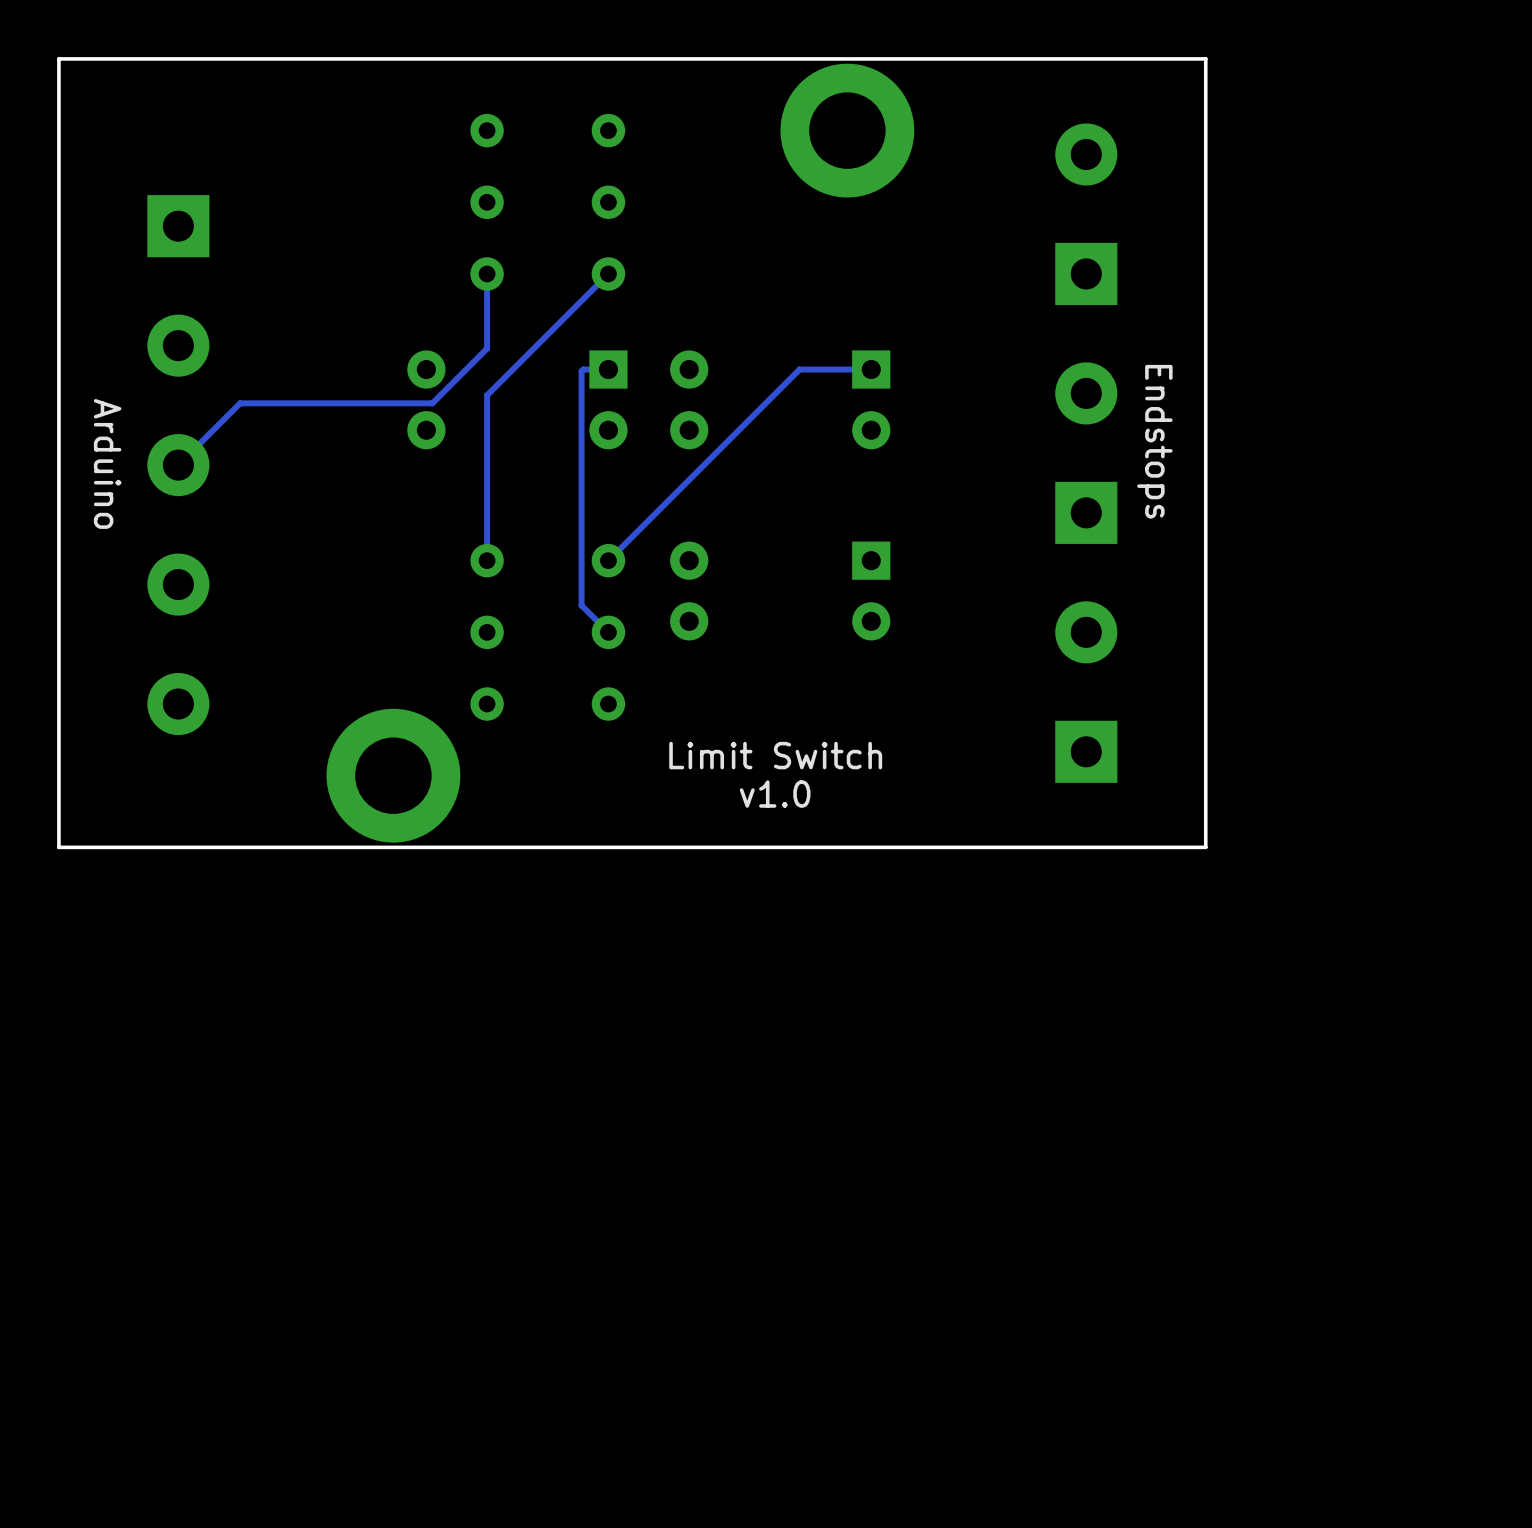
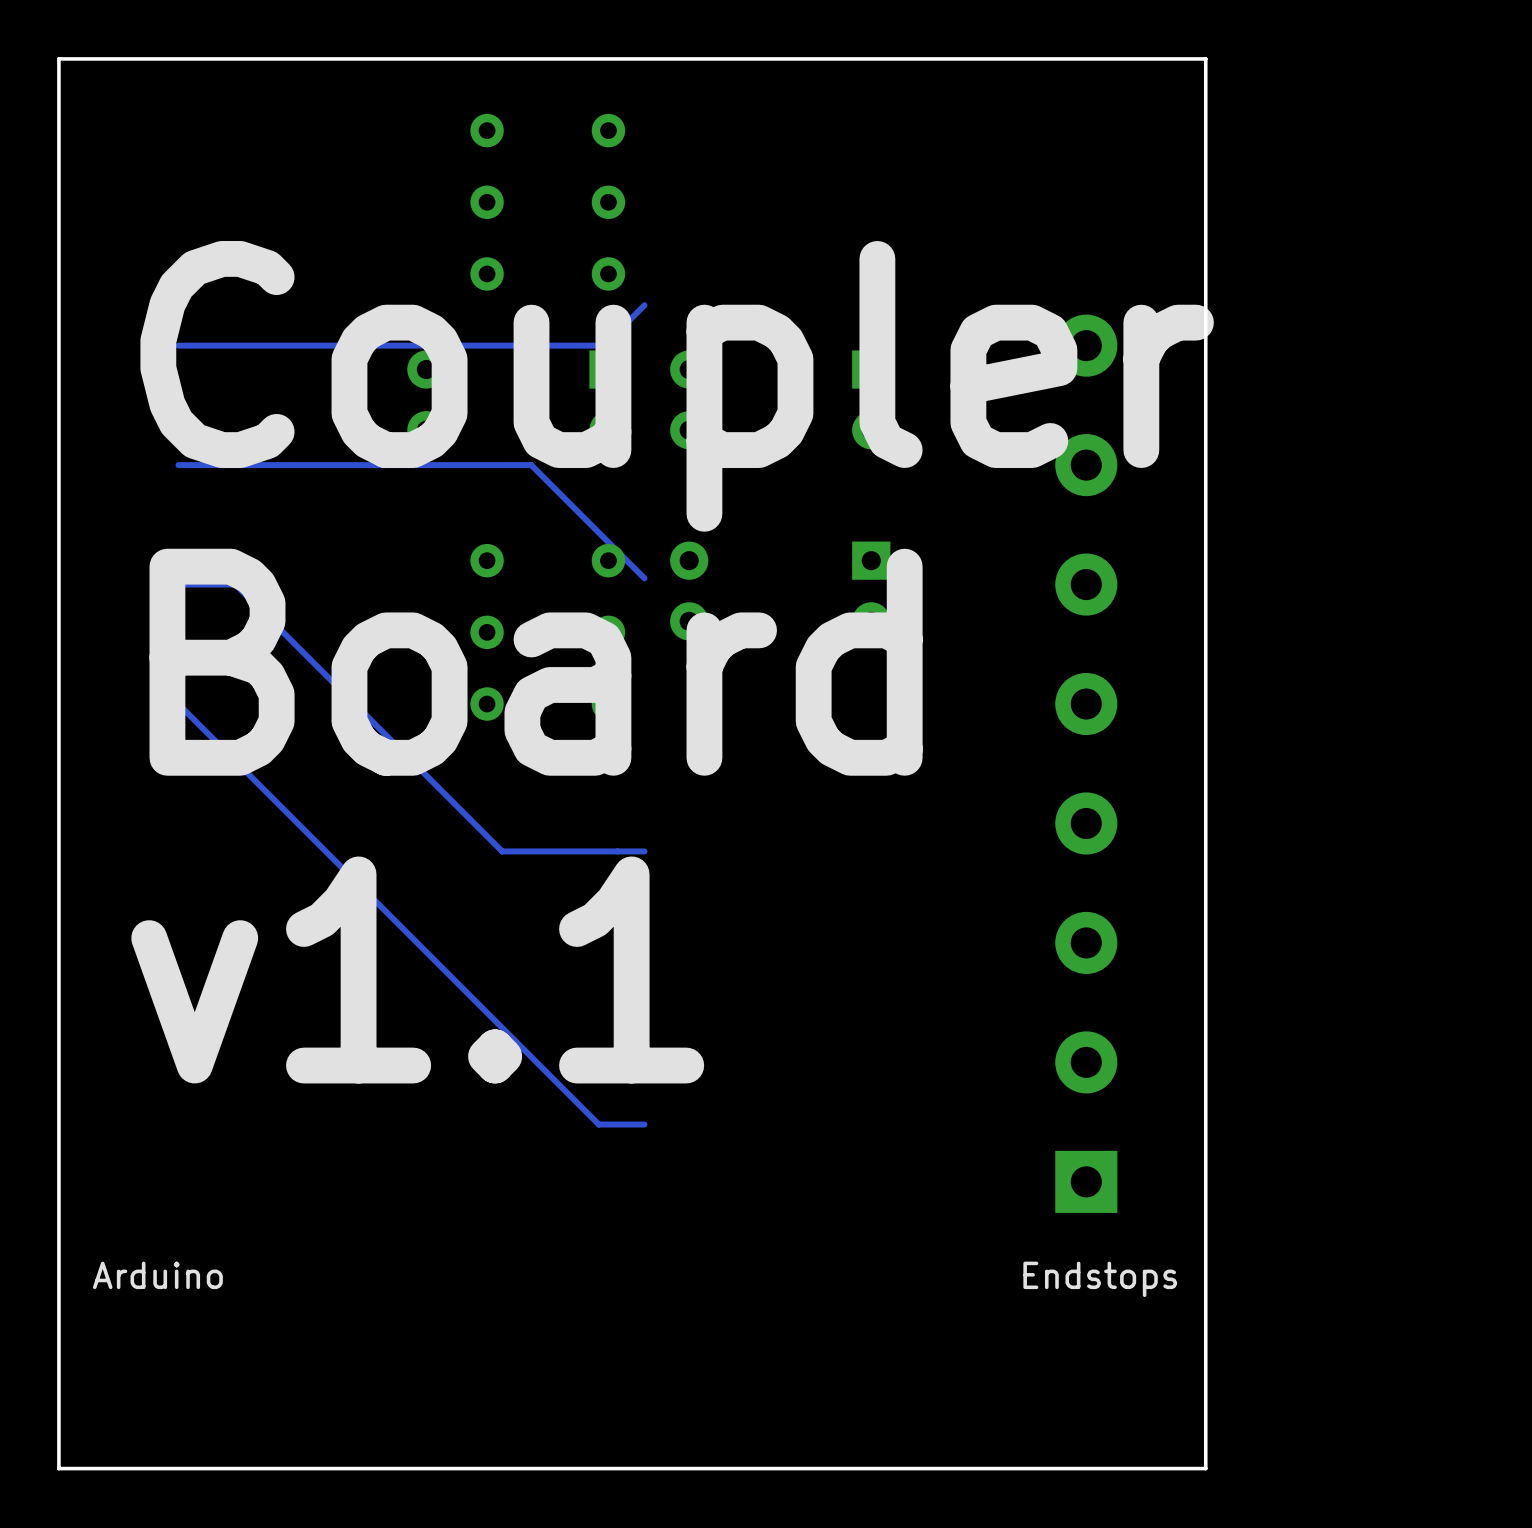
part: (847, 130) -> none
part: (1086, 214) -> none
track: (487, 273) (487, 348) (432, 403) (240, 403) (178, 465) -> (644, 578) (531, 465) (178, 465)
track: (608, 273) (487, 395) (487, 560) -> none
track: none -> (644, 305) (604, 345) (178, 345)
track: (608, 369) (583, 369) (581, 371) (581, 605) (608, 632) -> none
track: (871, 369) (799, 369) (608, 560) -> none
text: none -> Coupler (677, 386)
text: Endstops (1154, 441) -> none
part: (1086, 453) -> none
text: Arduino (107, 463) -> none
part: (178, 465) -> none
track: none -> (178, 584) (235, 584) (502, 851) (644, 851)
text: none -> Board (536, 662)
part: (1086, 692) -> none
track: none -> (178, 704) (598, 1124) (644, 1124)
text: Limit Switch (775, 755) -> none
part: none -> (1086, 763)
part: (393, 775) -> none
text: v1.0 (775, 794) -> none
board edge: (1205, 847) (58, 847) -> (1205, 847) (1205, 1468) (58, 1468) (58, 847)
text: none -> v1.1 (417, 969)
text: none -> Arduino (157, 1275)
text: none -> Endstops (1100, 1279)

